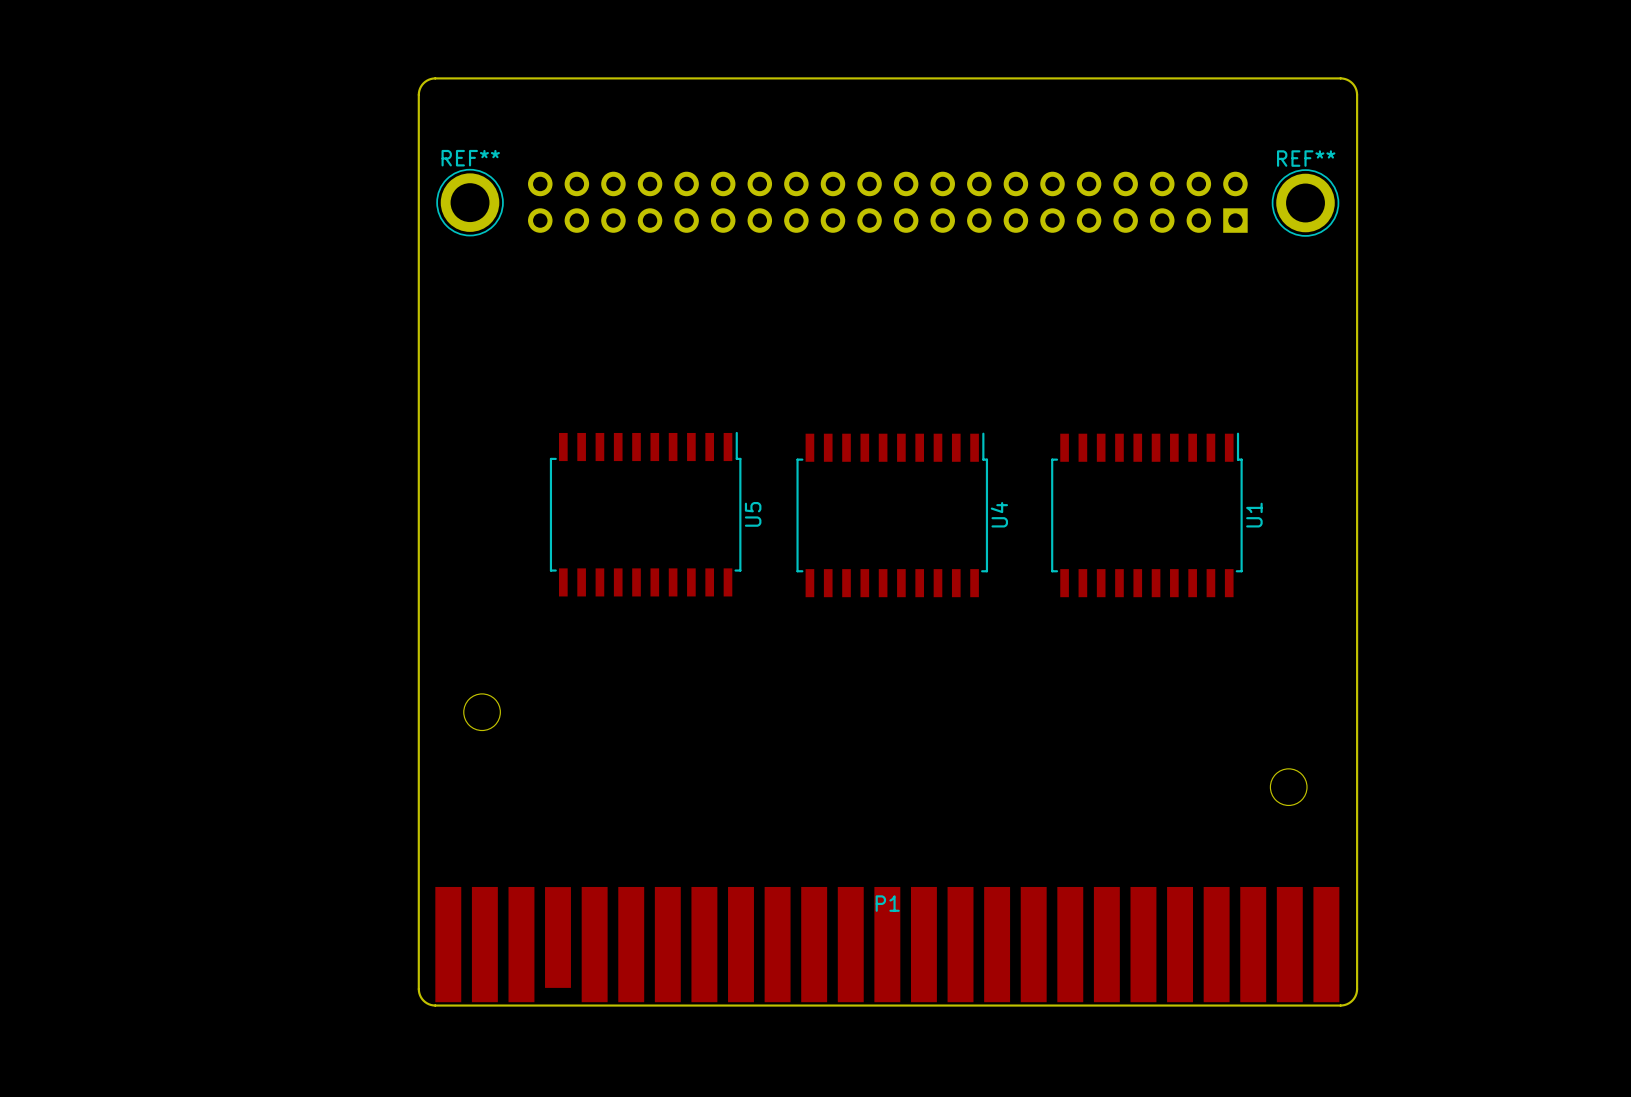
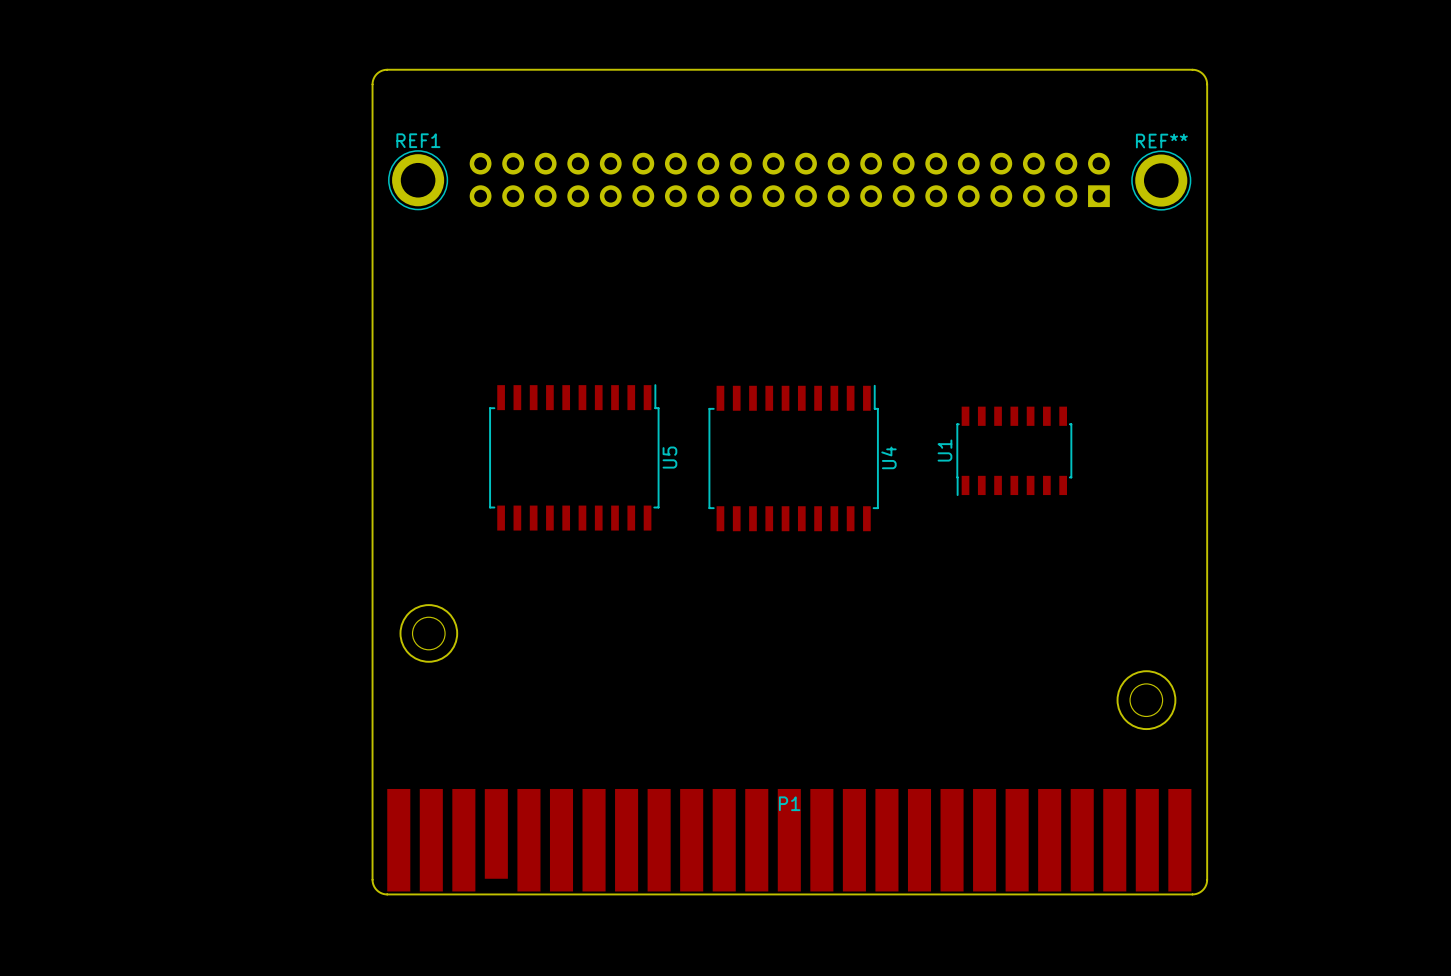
REF** name: REF** (470, 158) -> REF1 (418, 140)
U1 footprint: [1051, 432, 1243, 598] -> [956, 406, 1073, 497]
U1 name position: U1 (1254, 515) -> U1 (944, 450)
round board edge: none -> [399, 604, 459, 663]
round board edge: none -> [1116, 670, 1177, 731]

